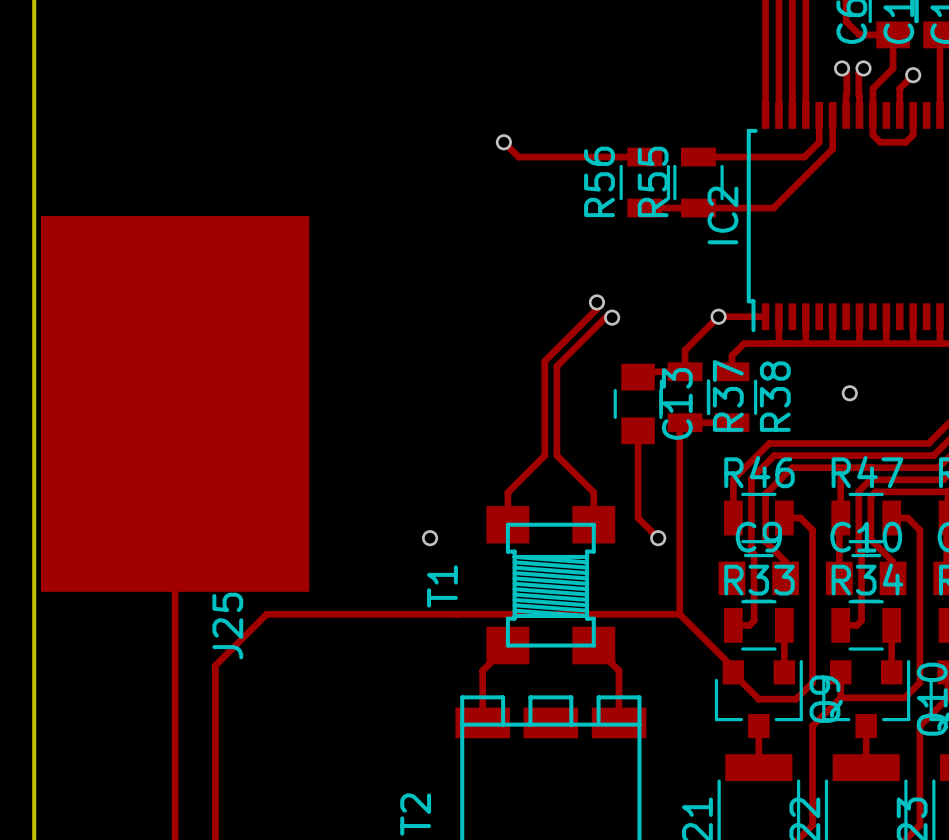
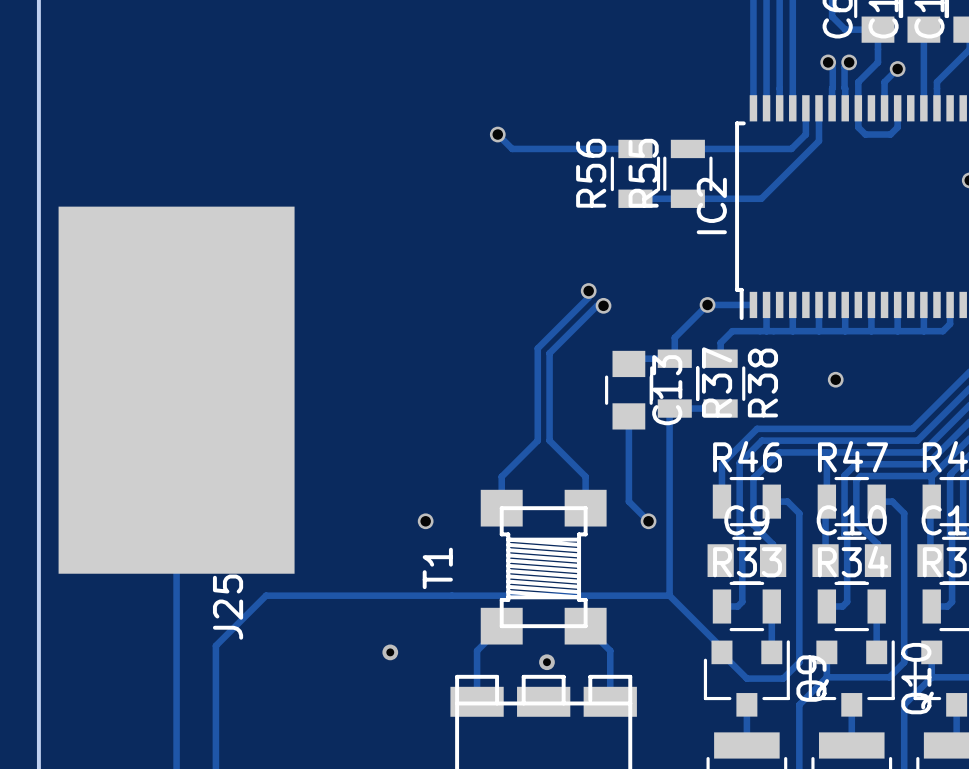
J25 footprint: [40, 216, 310, 592] -> [58, 206, 295, 574]
via: none -> (390, 652)
via: none -> (546, 662)

